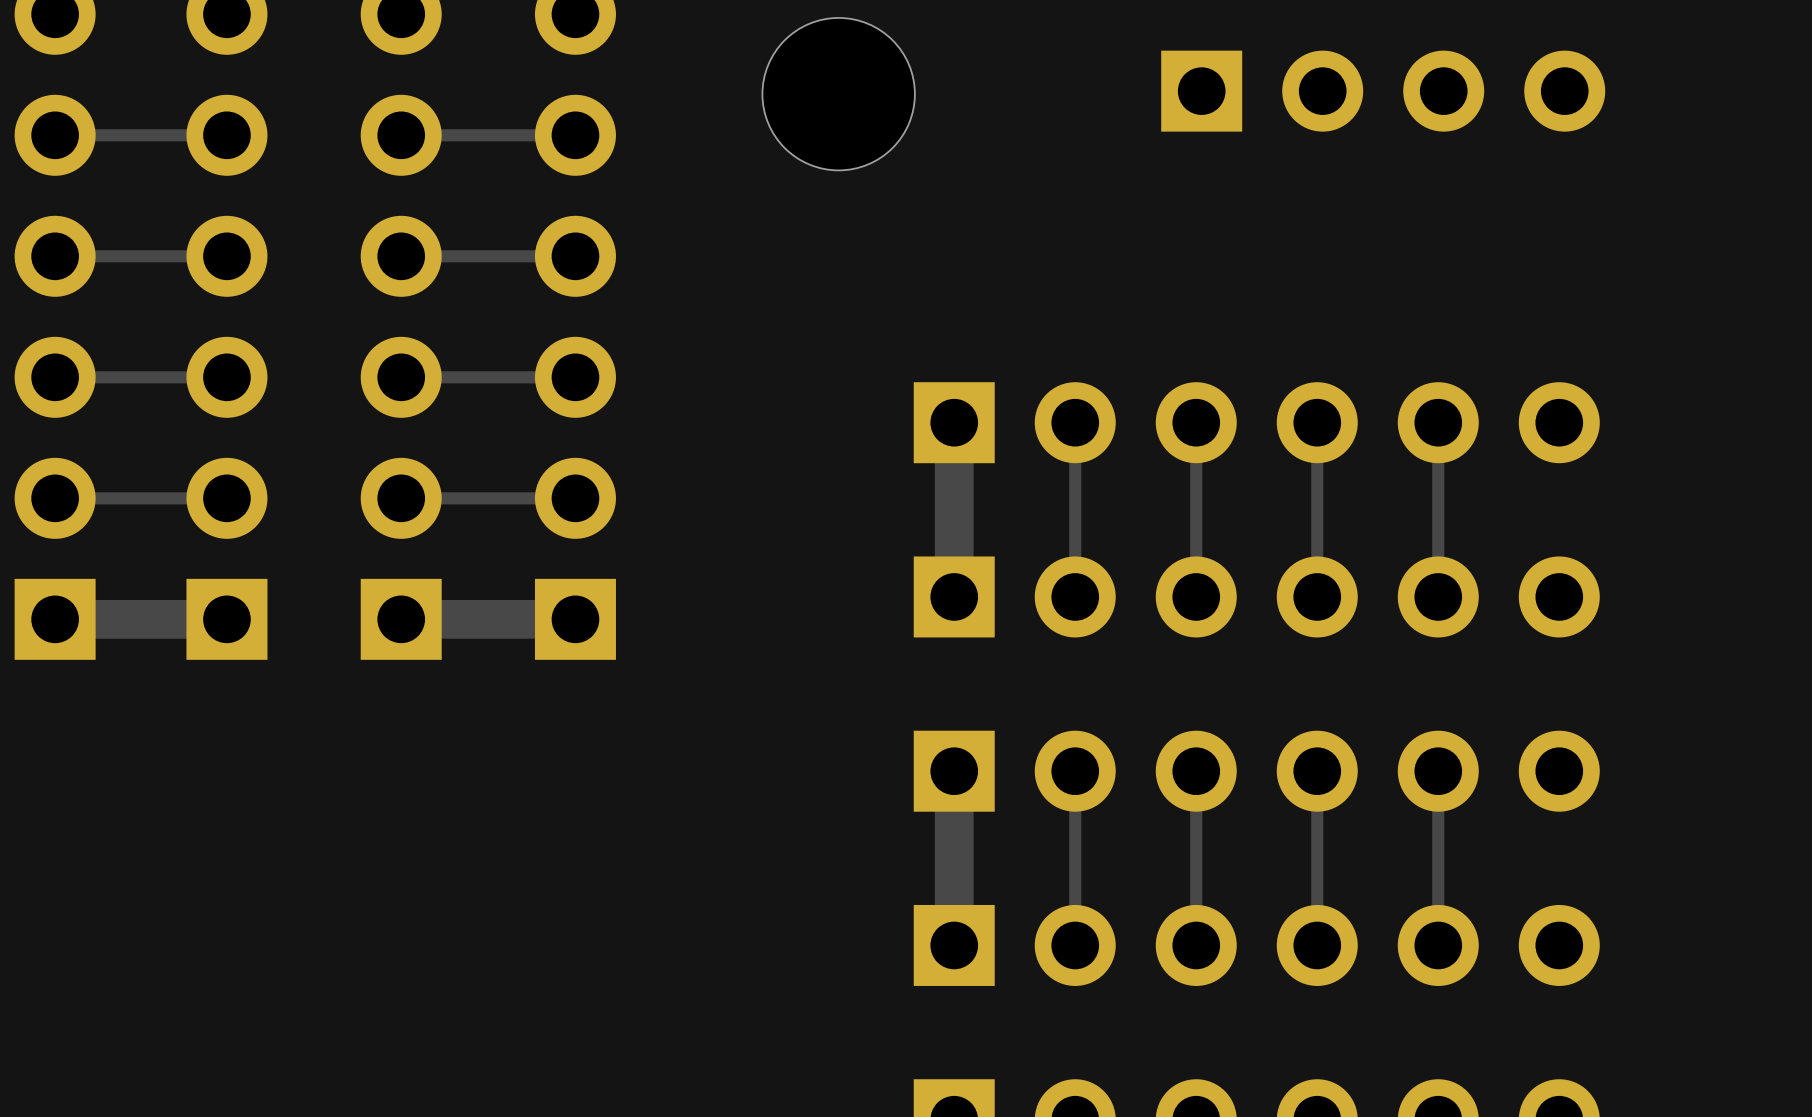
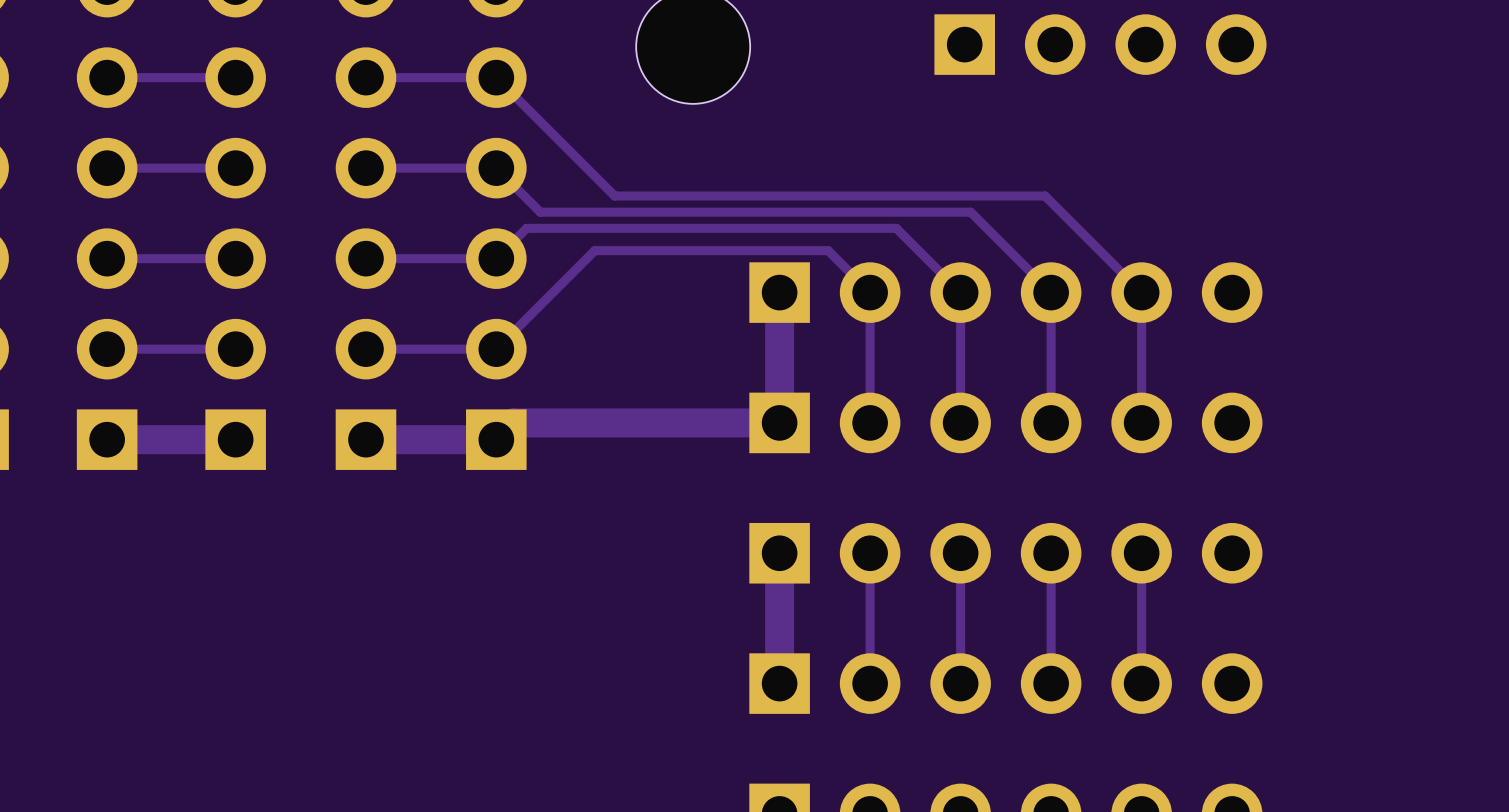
track: none -> (496, 77) (614, 196) (1045, 196) (1141, 292)
track: none -> (496, 168) (540, 212) (970, 212) (1051, 292)
track: none -> (496, 258) (526, 228) (896, 228) (960, 292)
track: none -> (870, 292) (828, 250) (594, 250) (496, 349)
track: none -> (779, 422) (513, 422) (496, 439)

